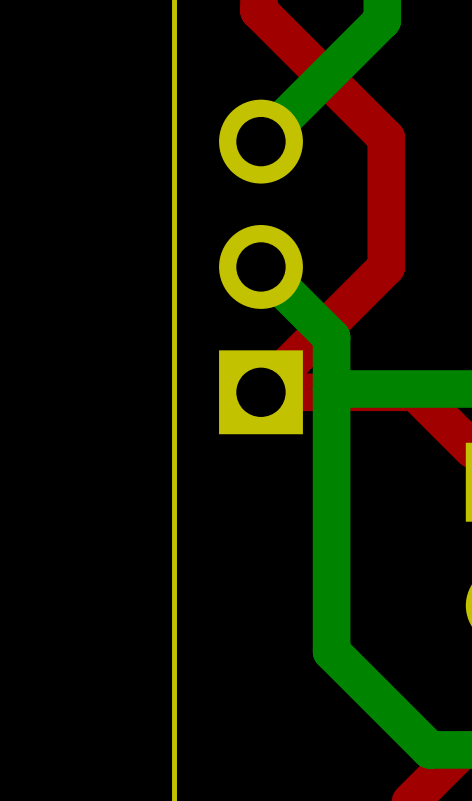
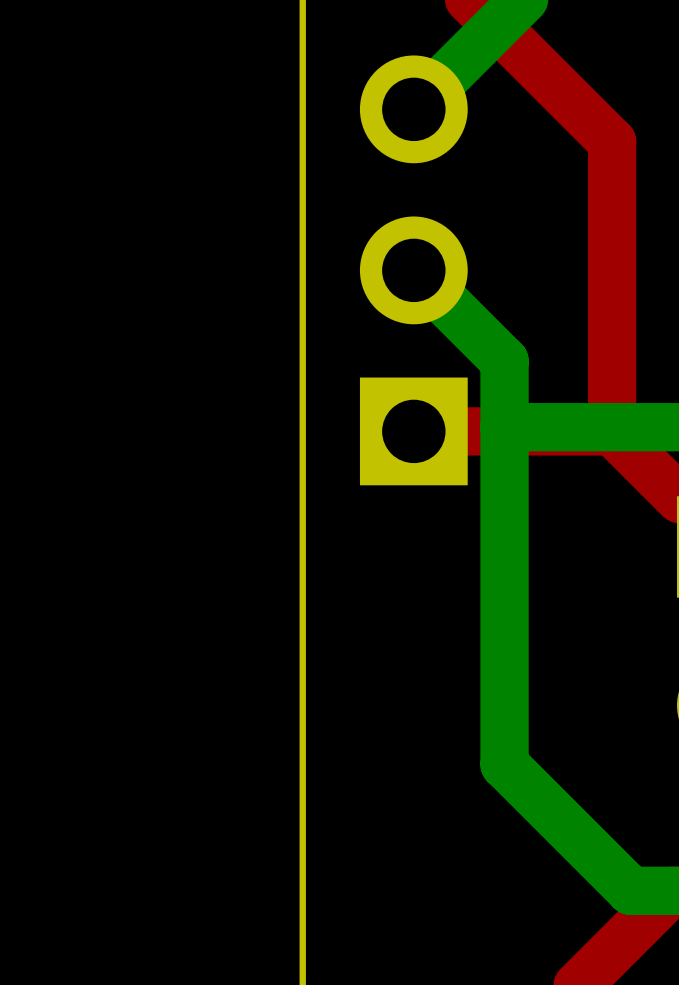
top track: (386, 138) (386, 267) (260, 392) -> (574, 104) (612, 142) (612, 431)

